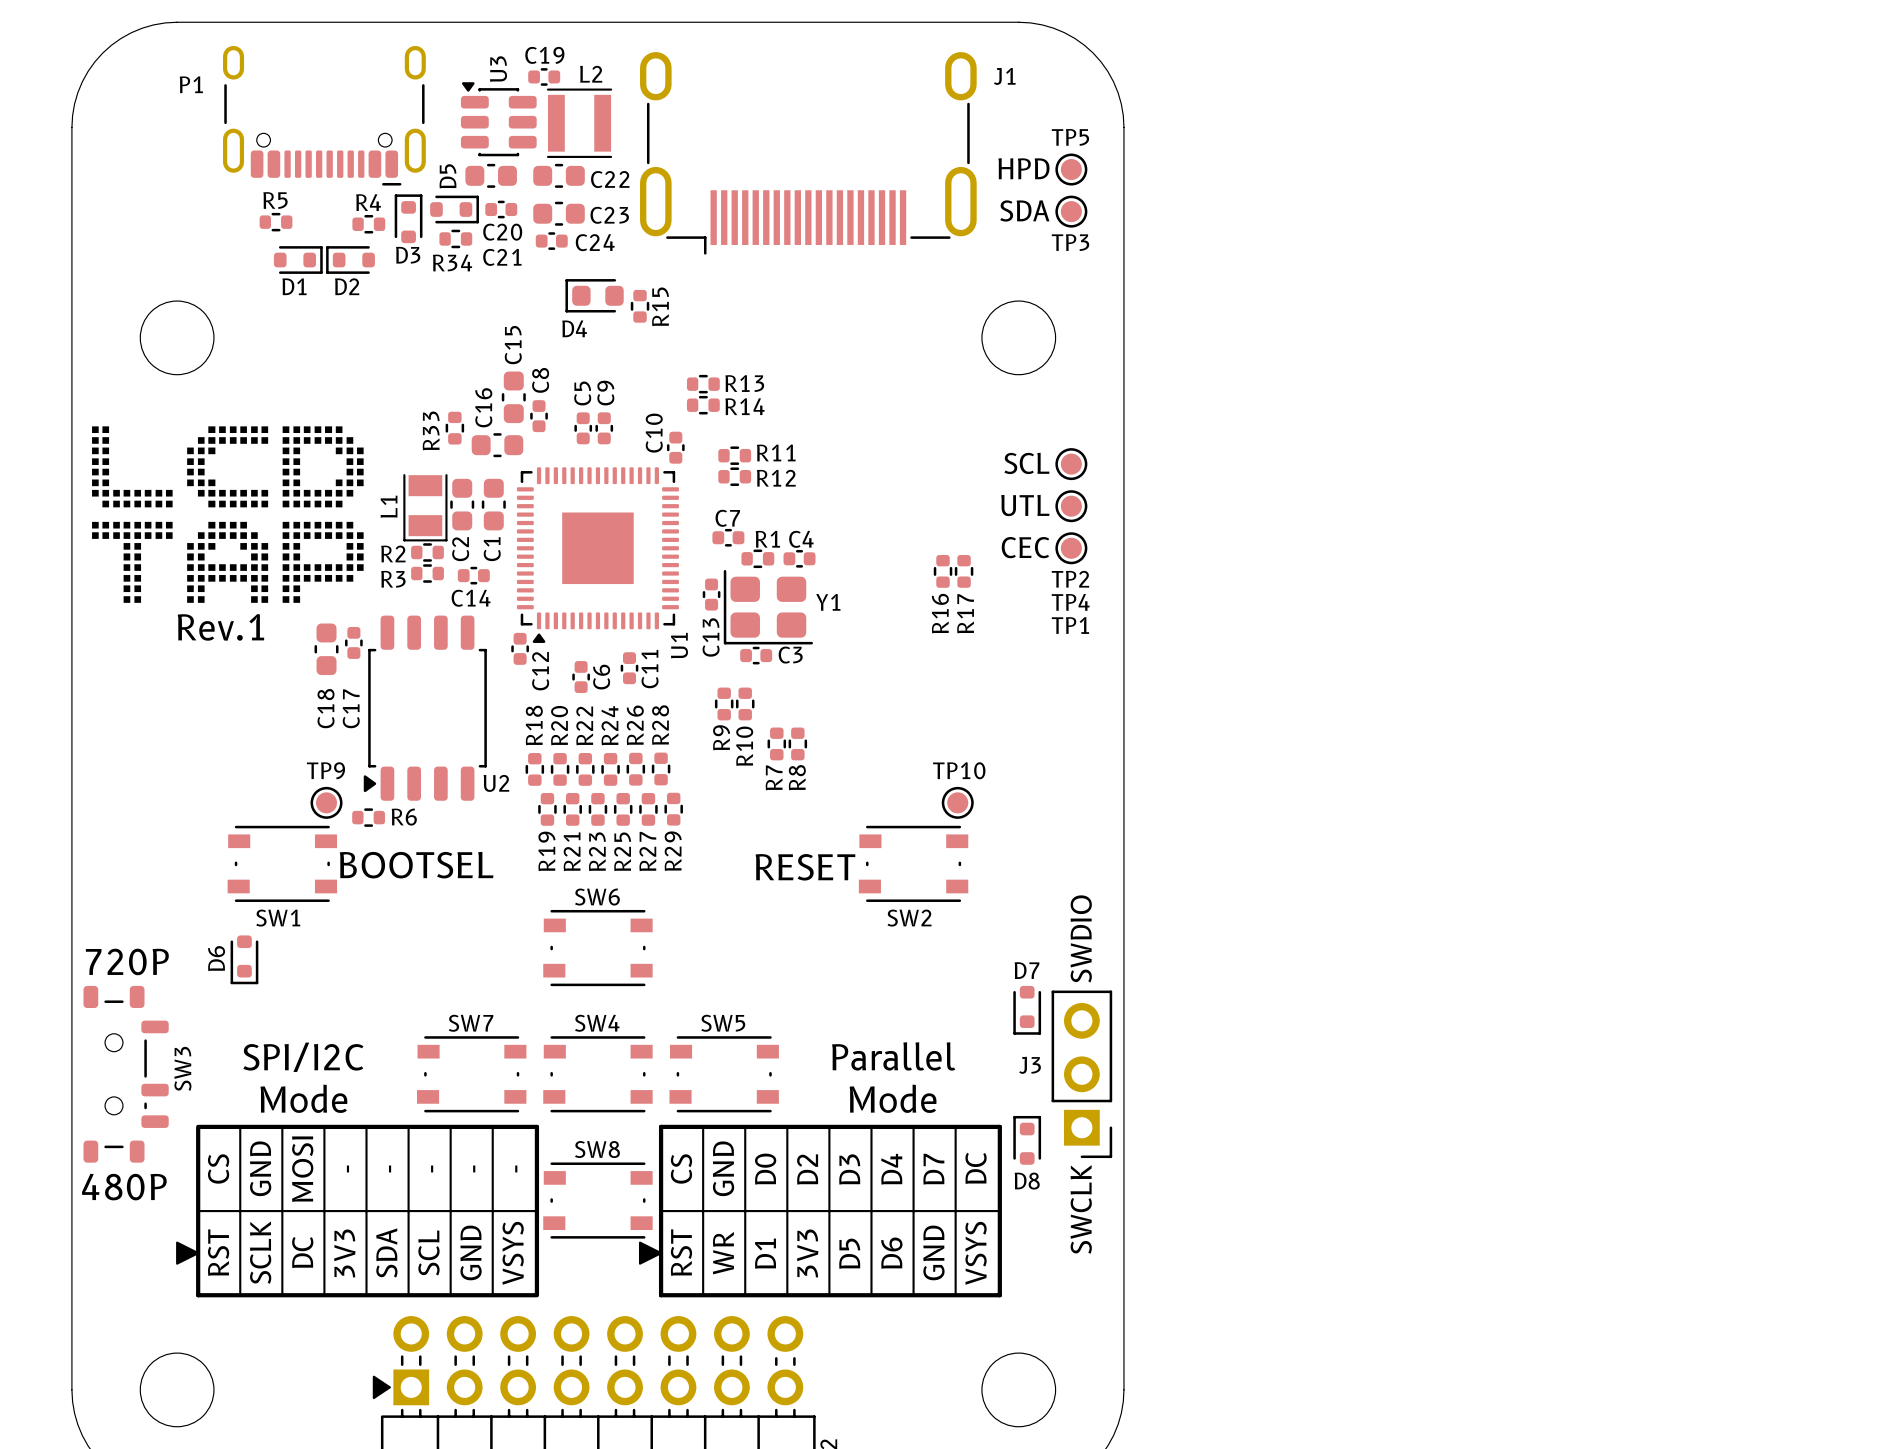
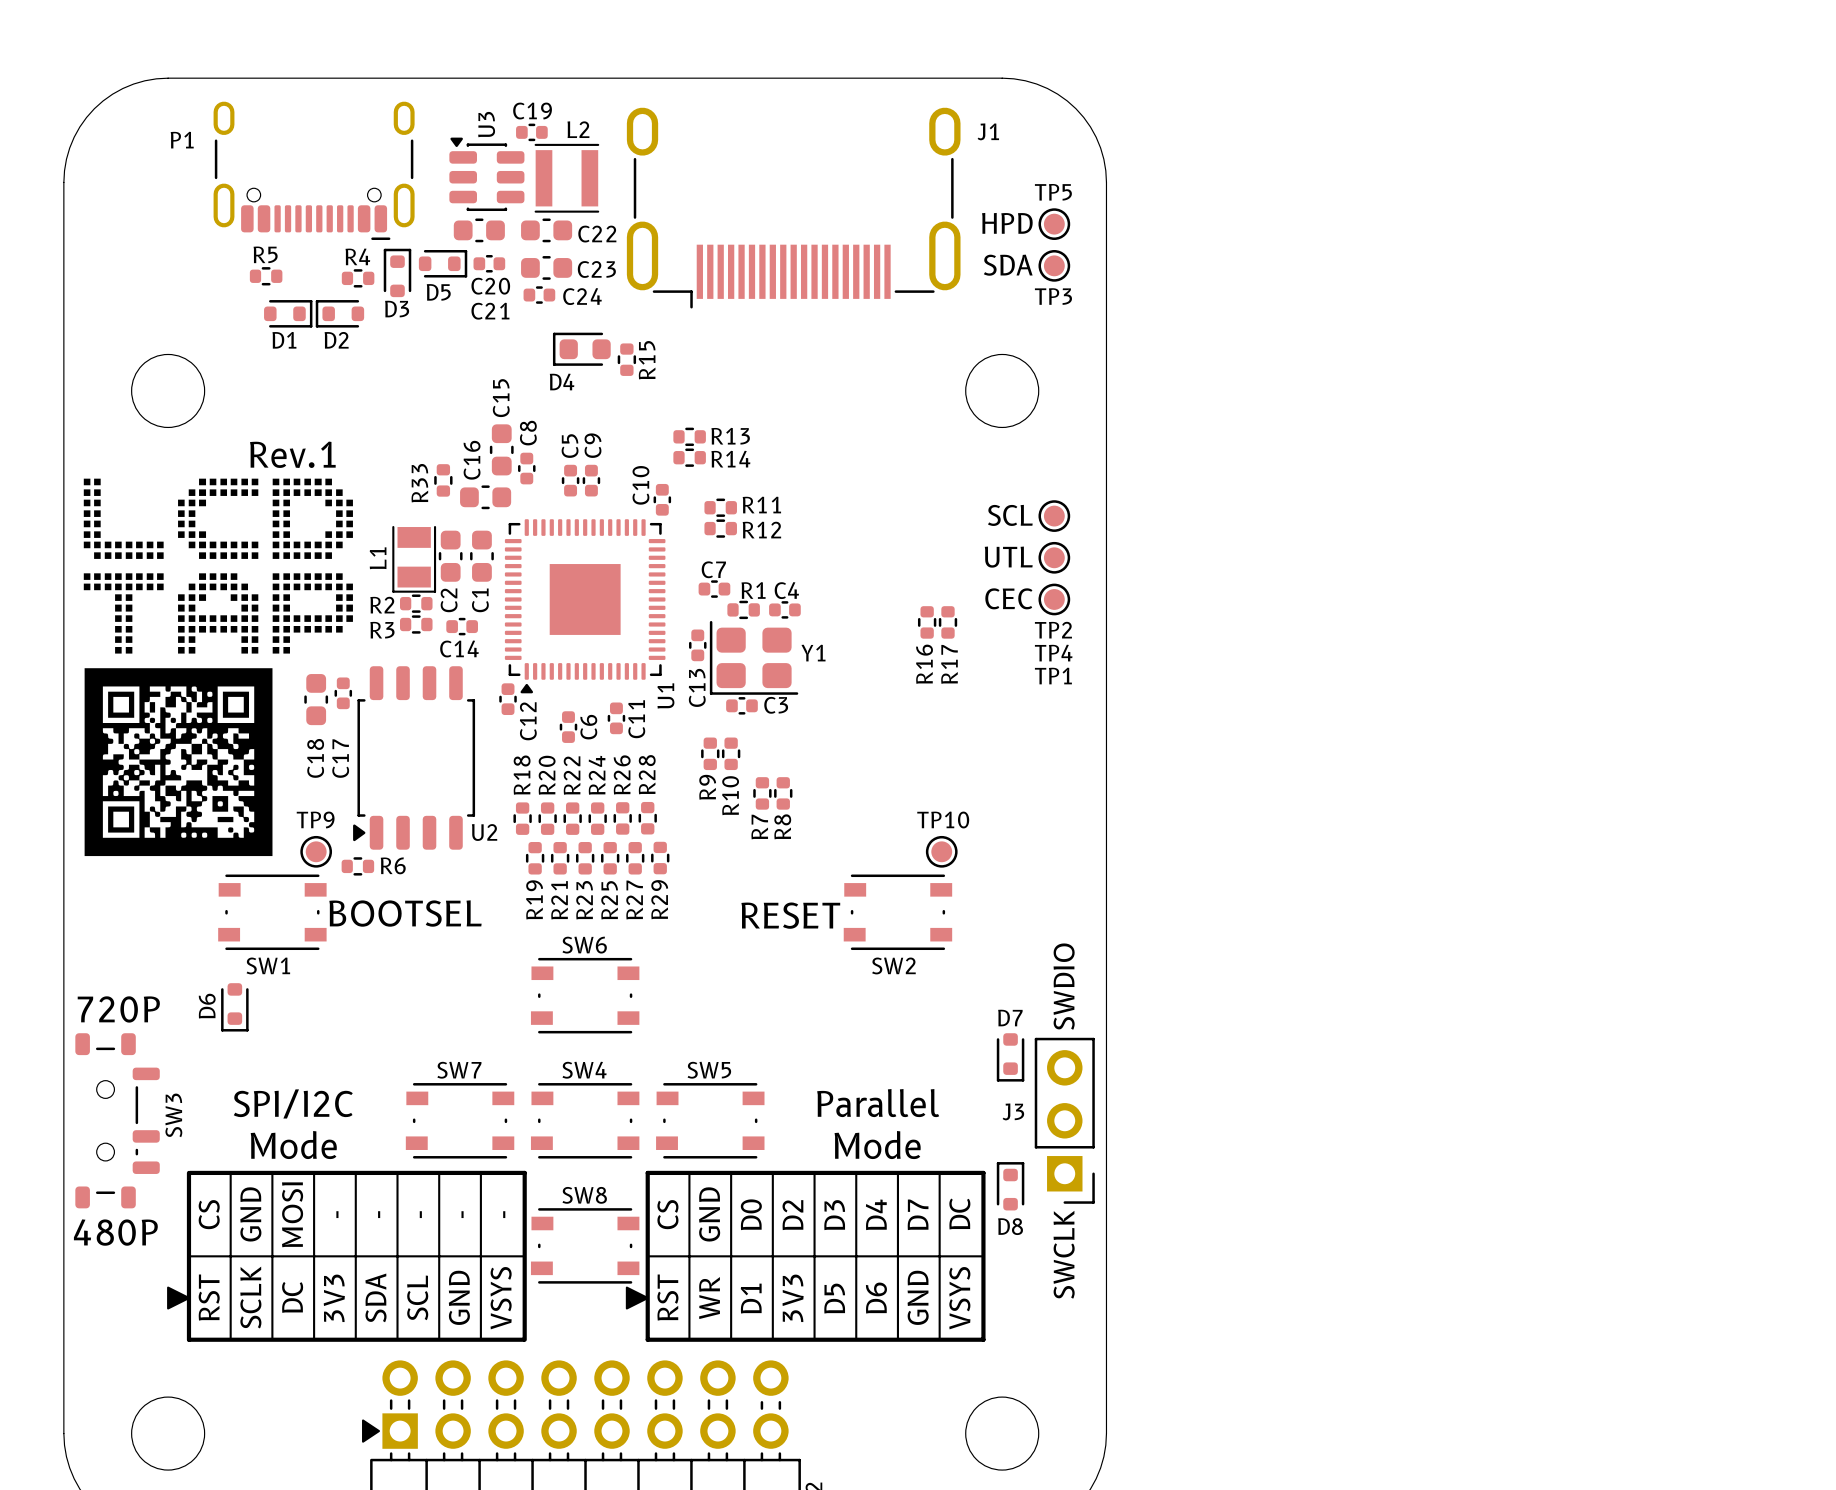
D5 name rotation: 0° (447, 176) -> 90° clockwise (438, 292)
D5 name position: D5 (447, 176) -> D5 (438, 292)
R34: (455, 238) -> none
drawing: none -> [84, 668, 273, 857]
text position: Rev.1 (220, 627) -> Rev.1 (292, 454)

